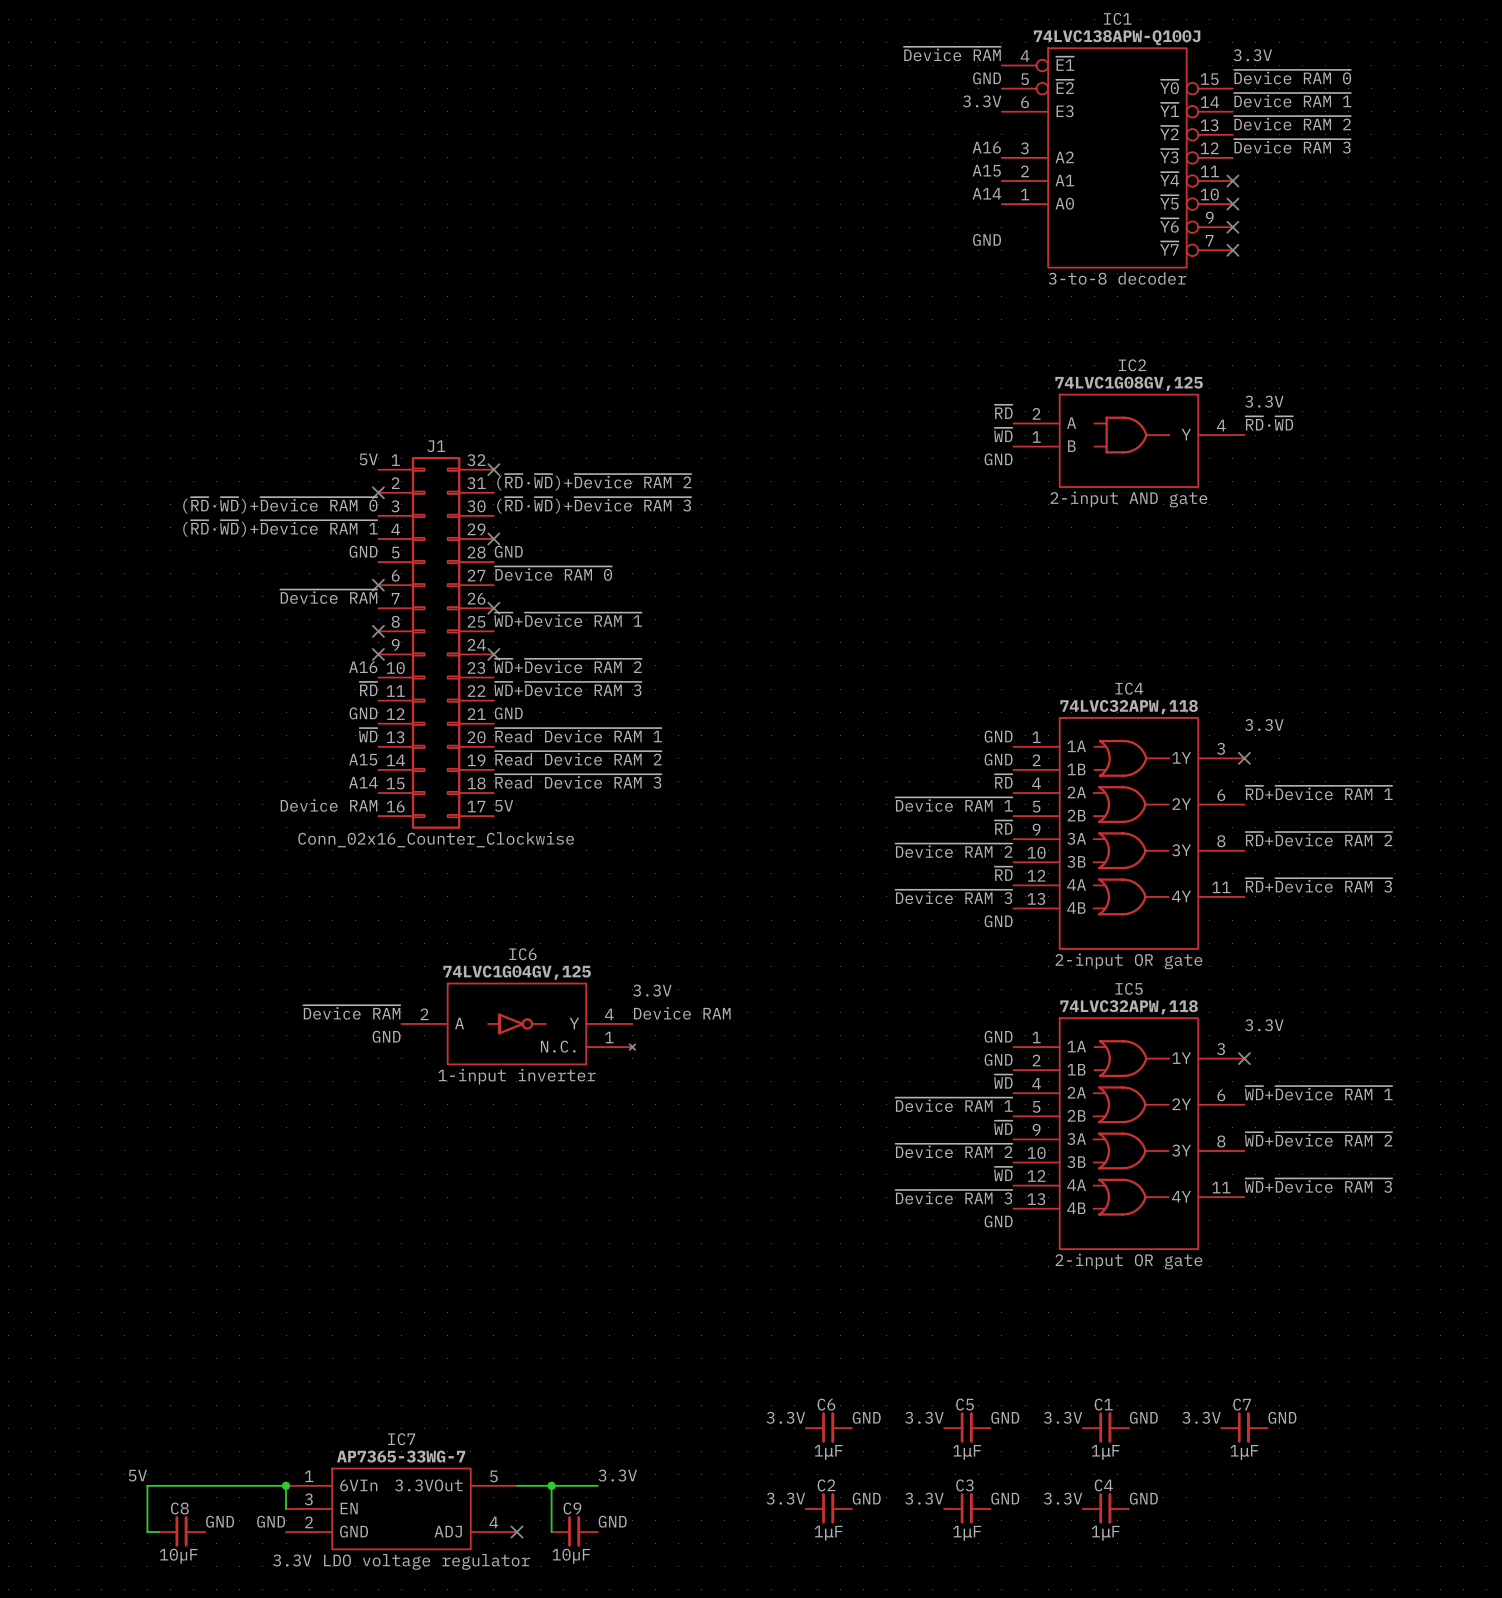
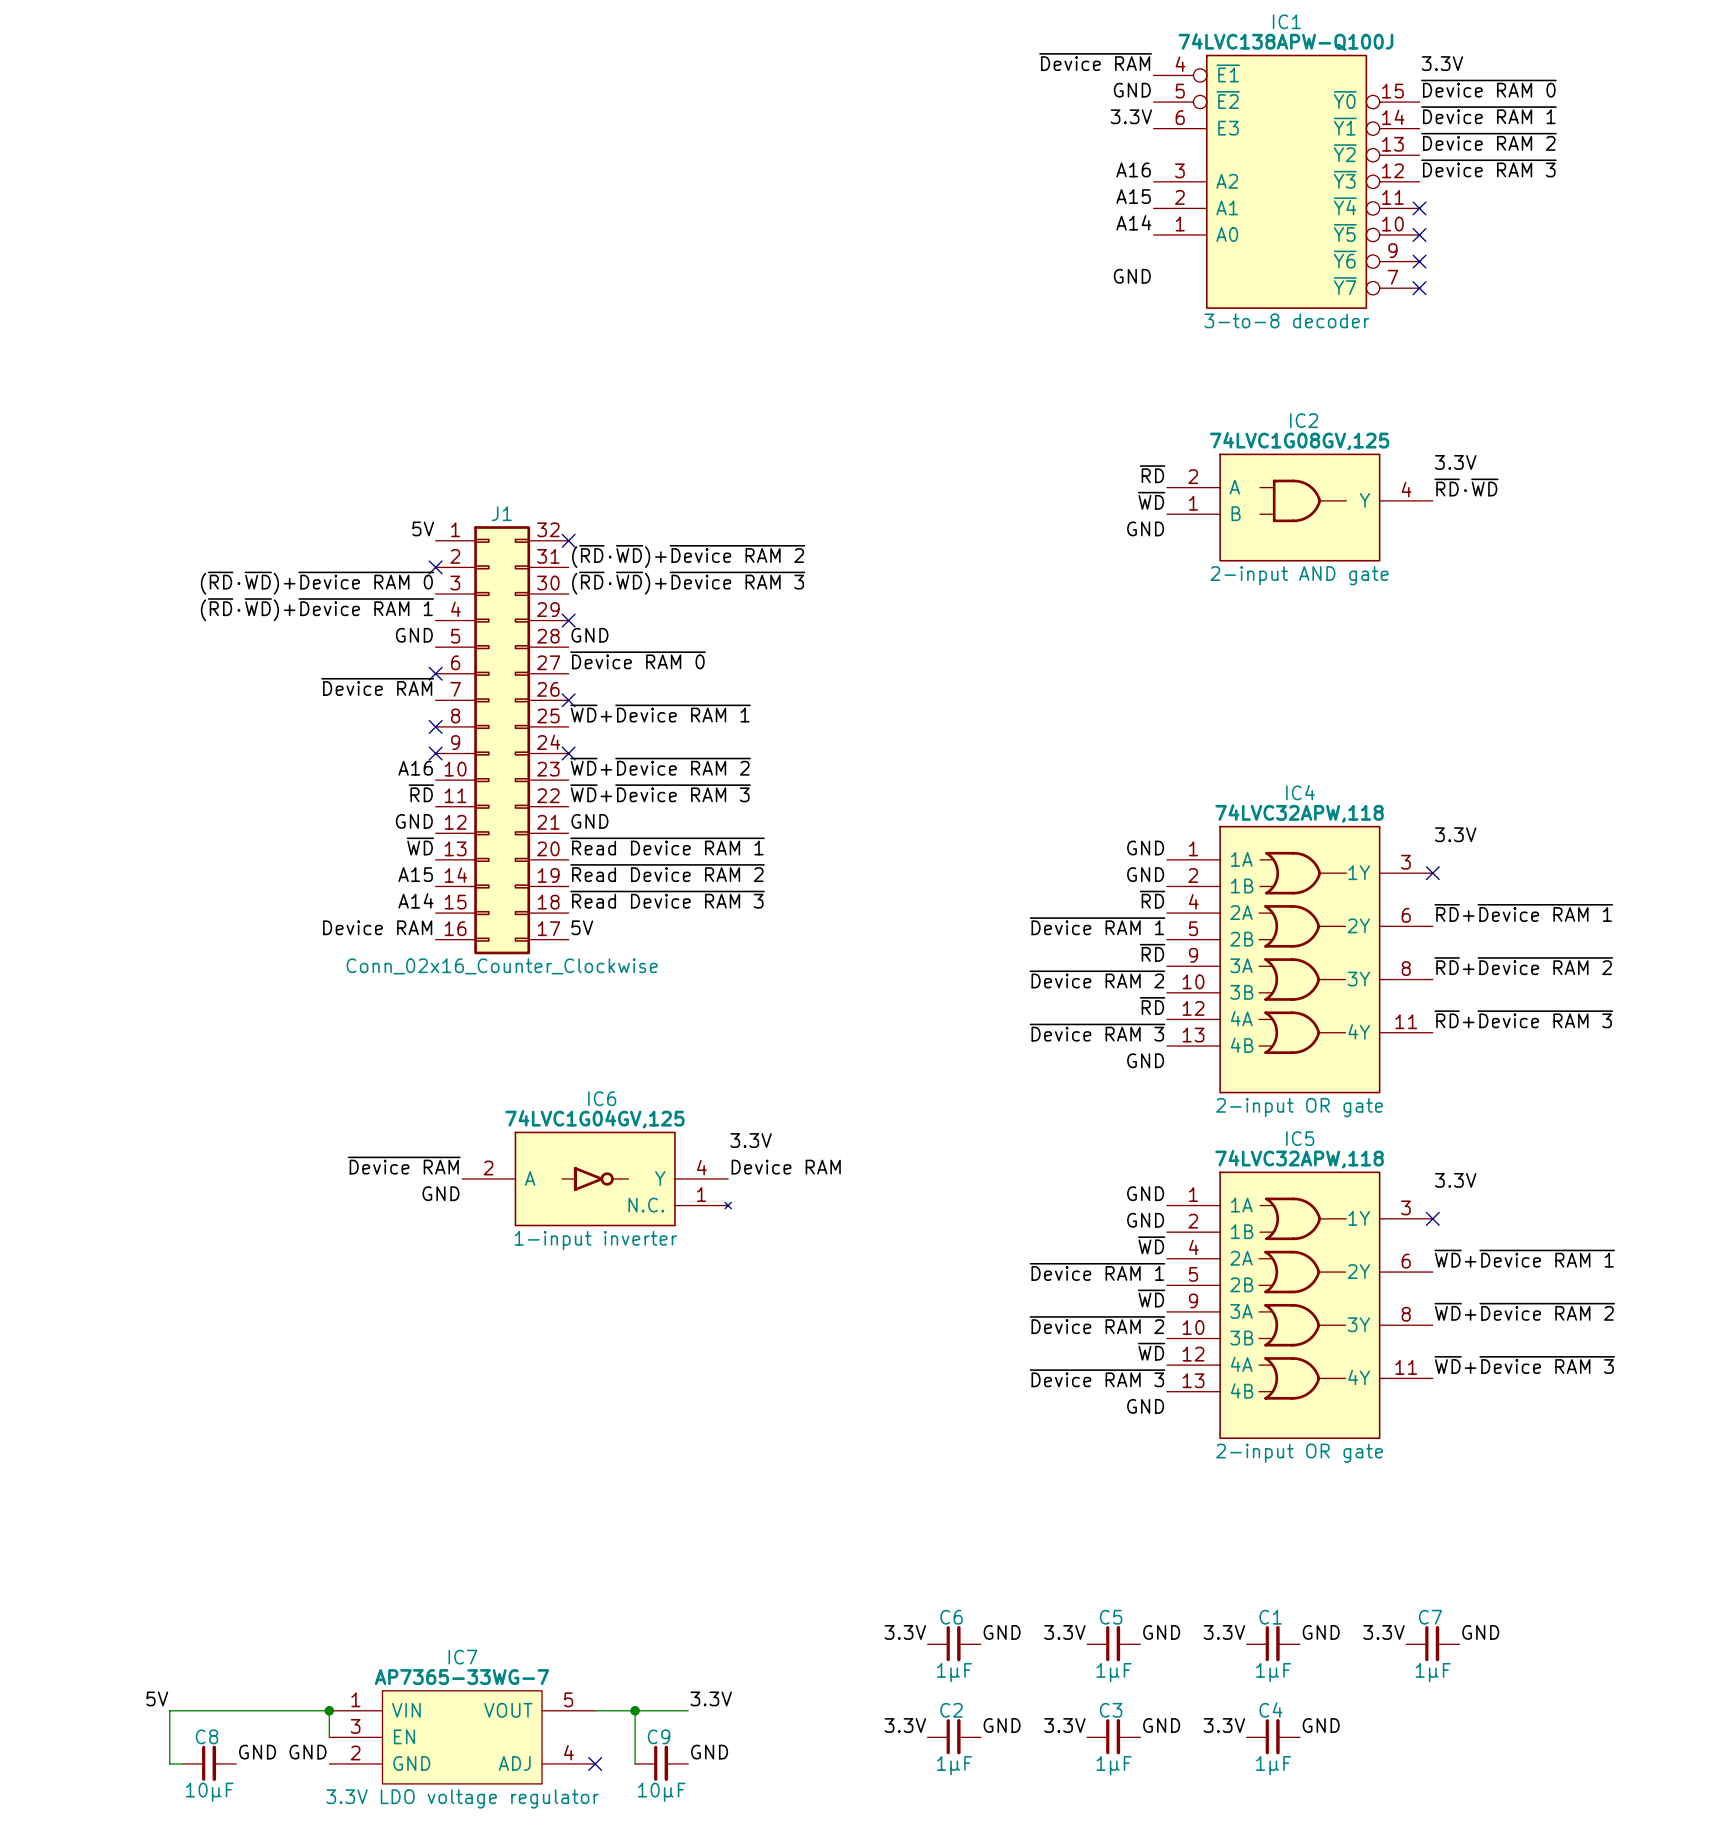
IC7 pin name: 6VIn (358, 1485) -> VIN (406, 1710)
IC7 pin name: 3.3VOut (428, 1485) -> VOUT (508, 1710)

